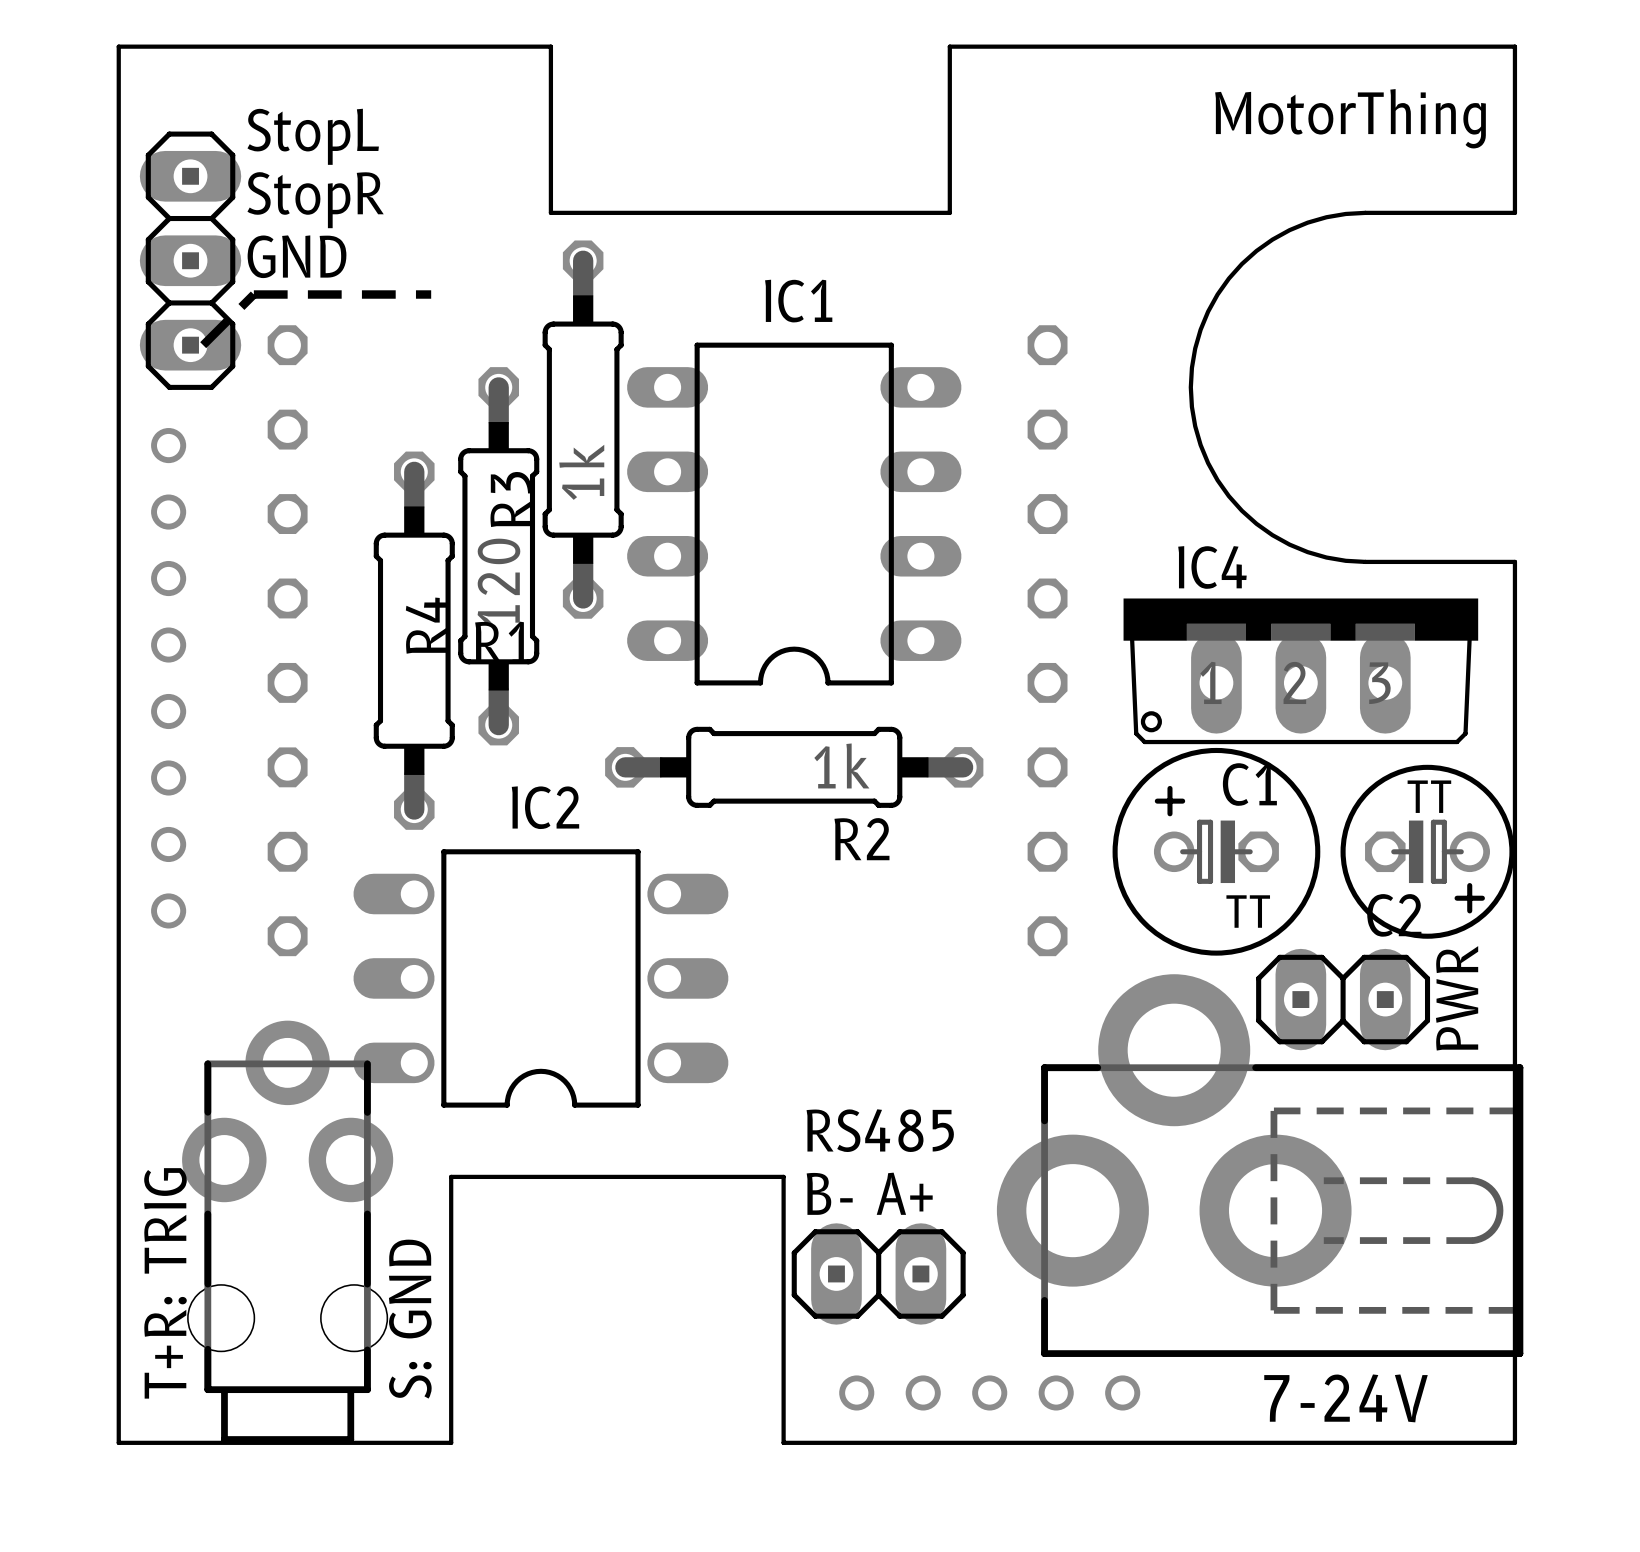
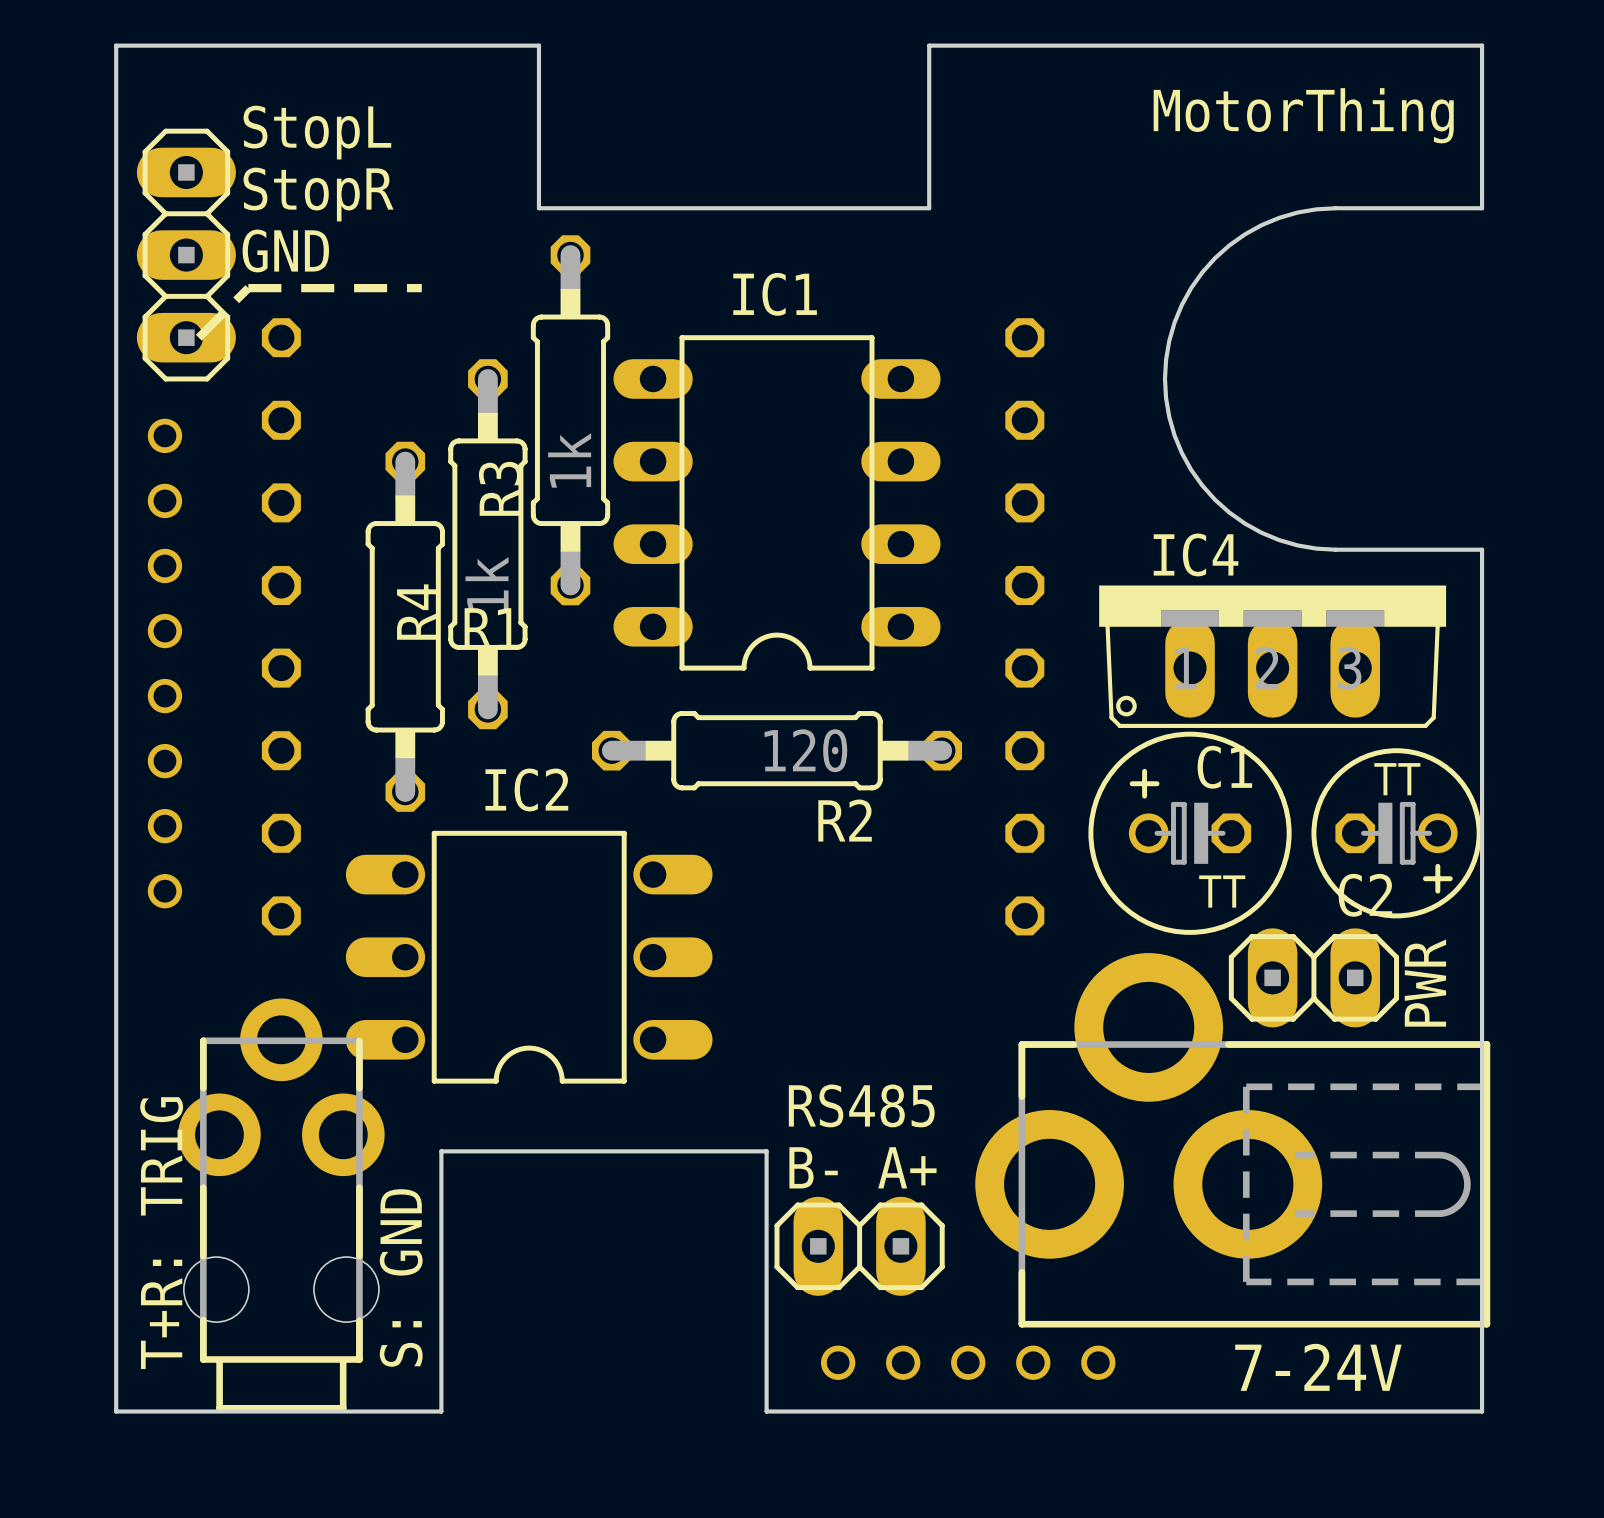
R4 value: 120 (498, 582) -> 1k (487, 584)
R2 value: 1k (841, 765) -> 120 (805, 750)

